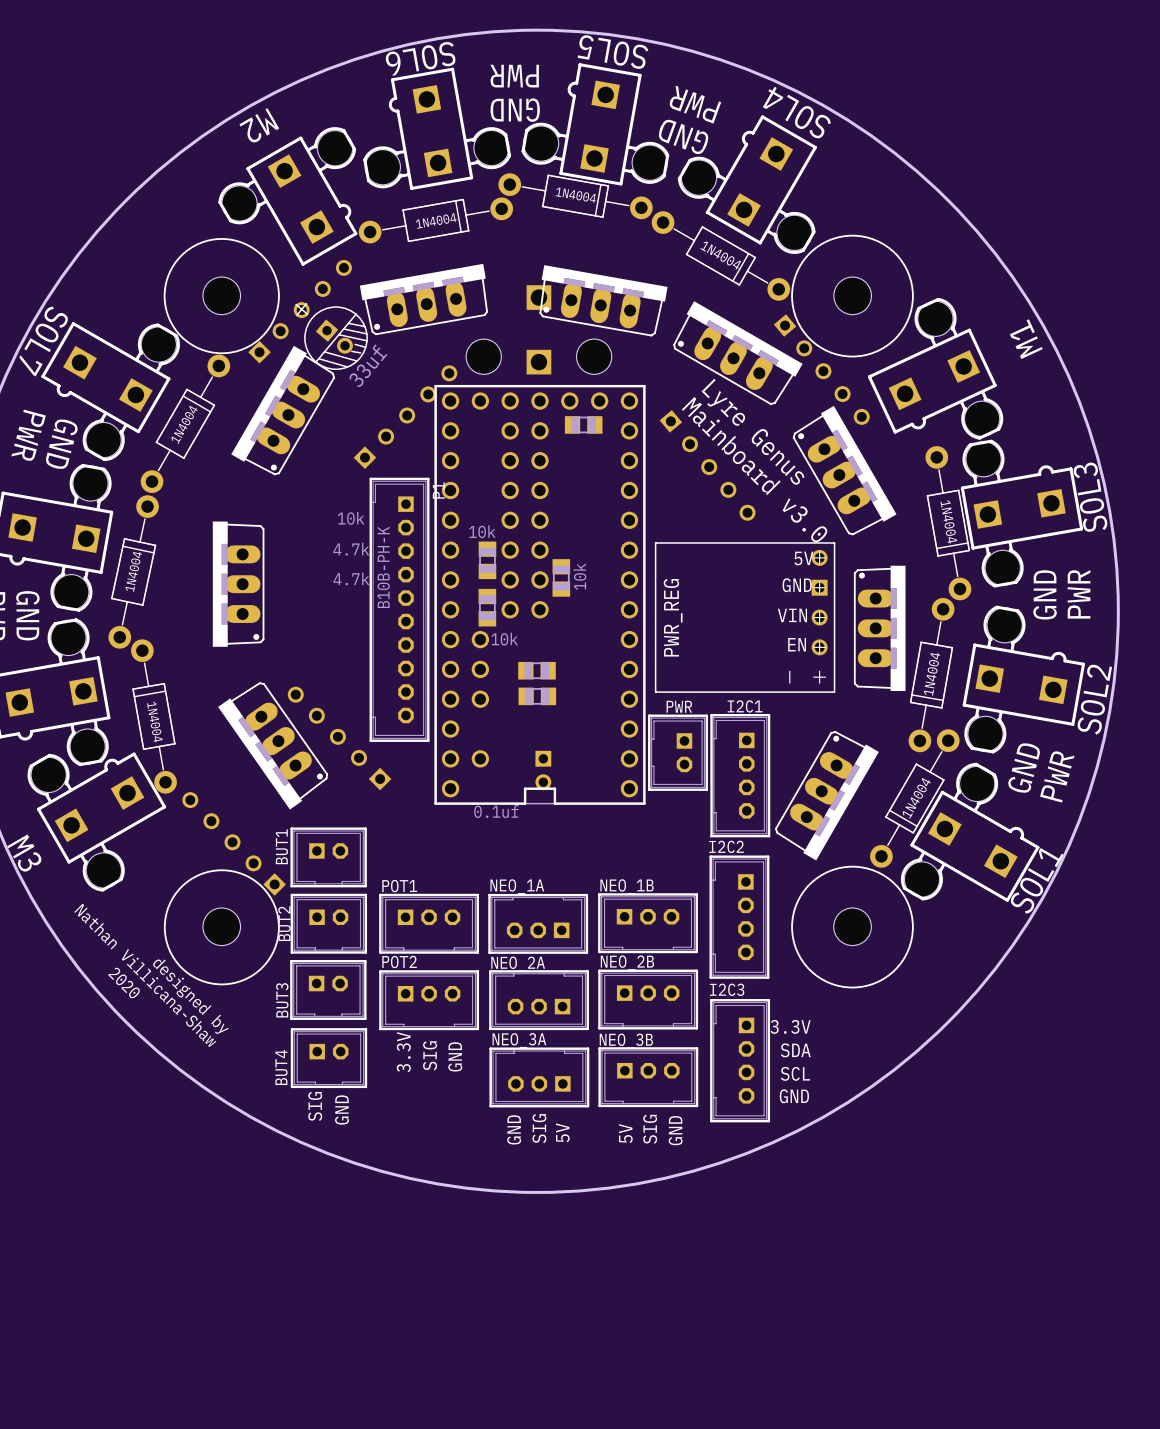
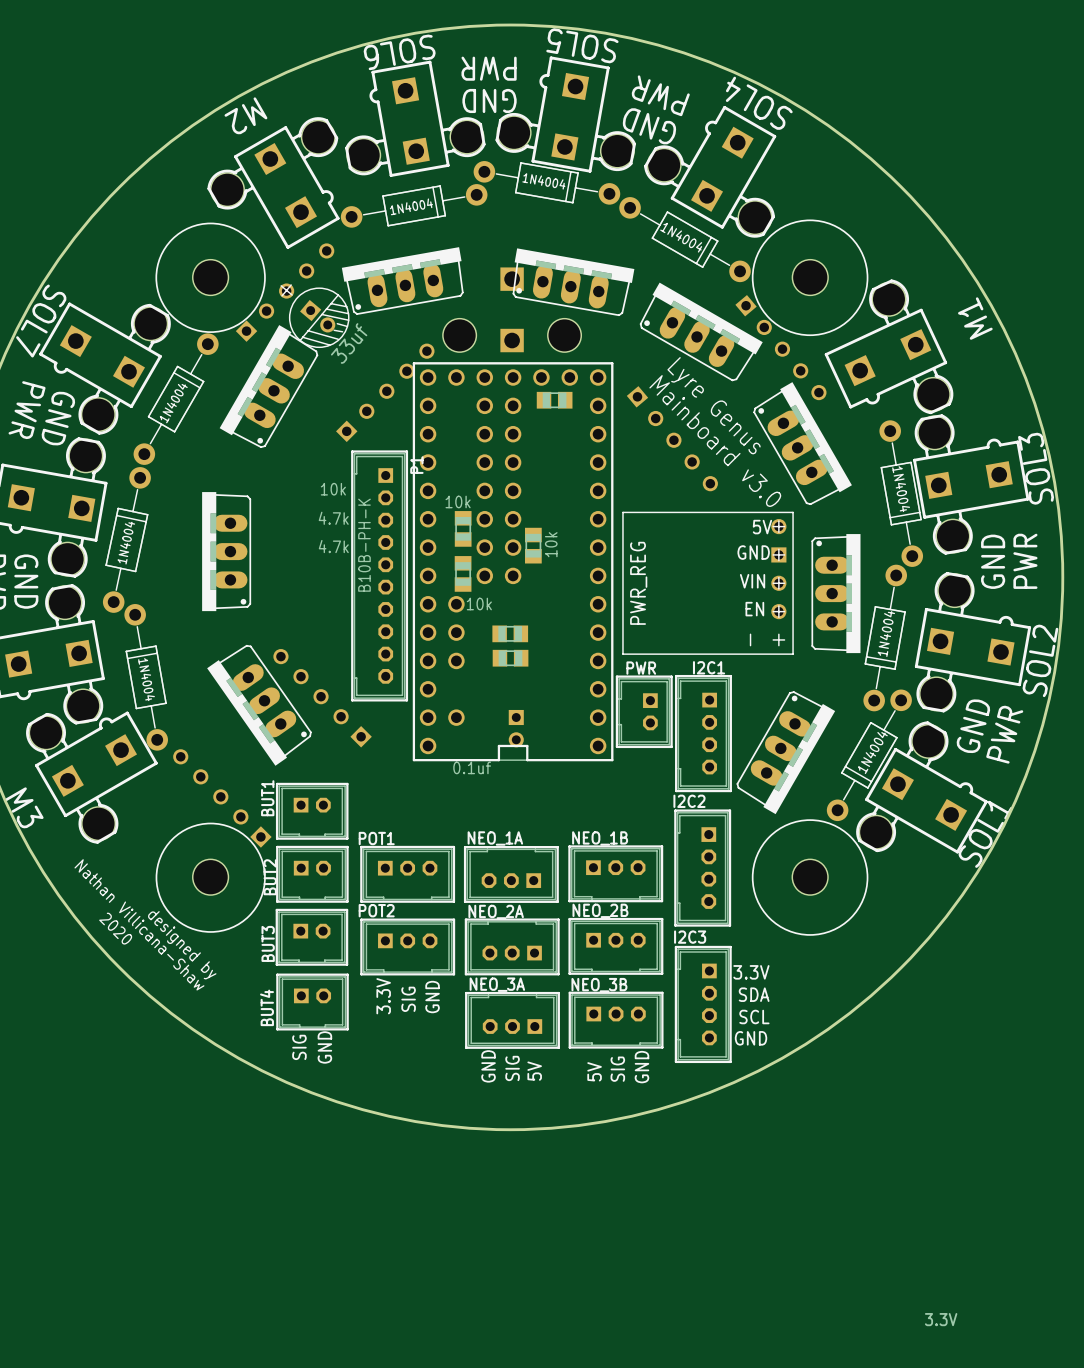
text: none -> 3.3V (941, 1319)

